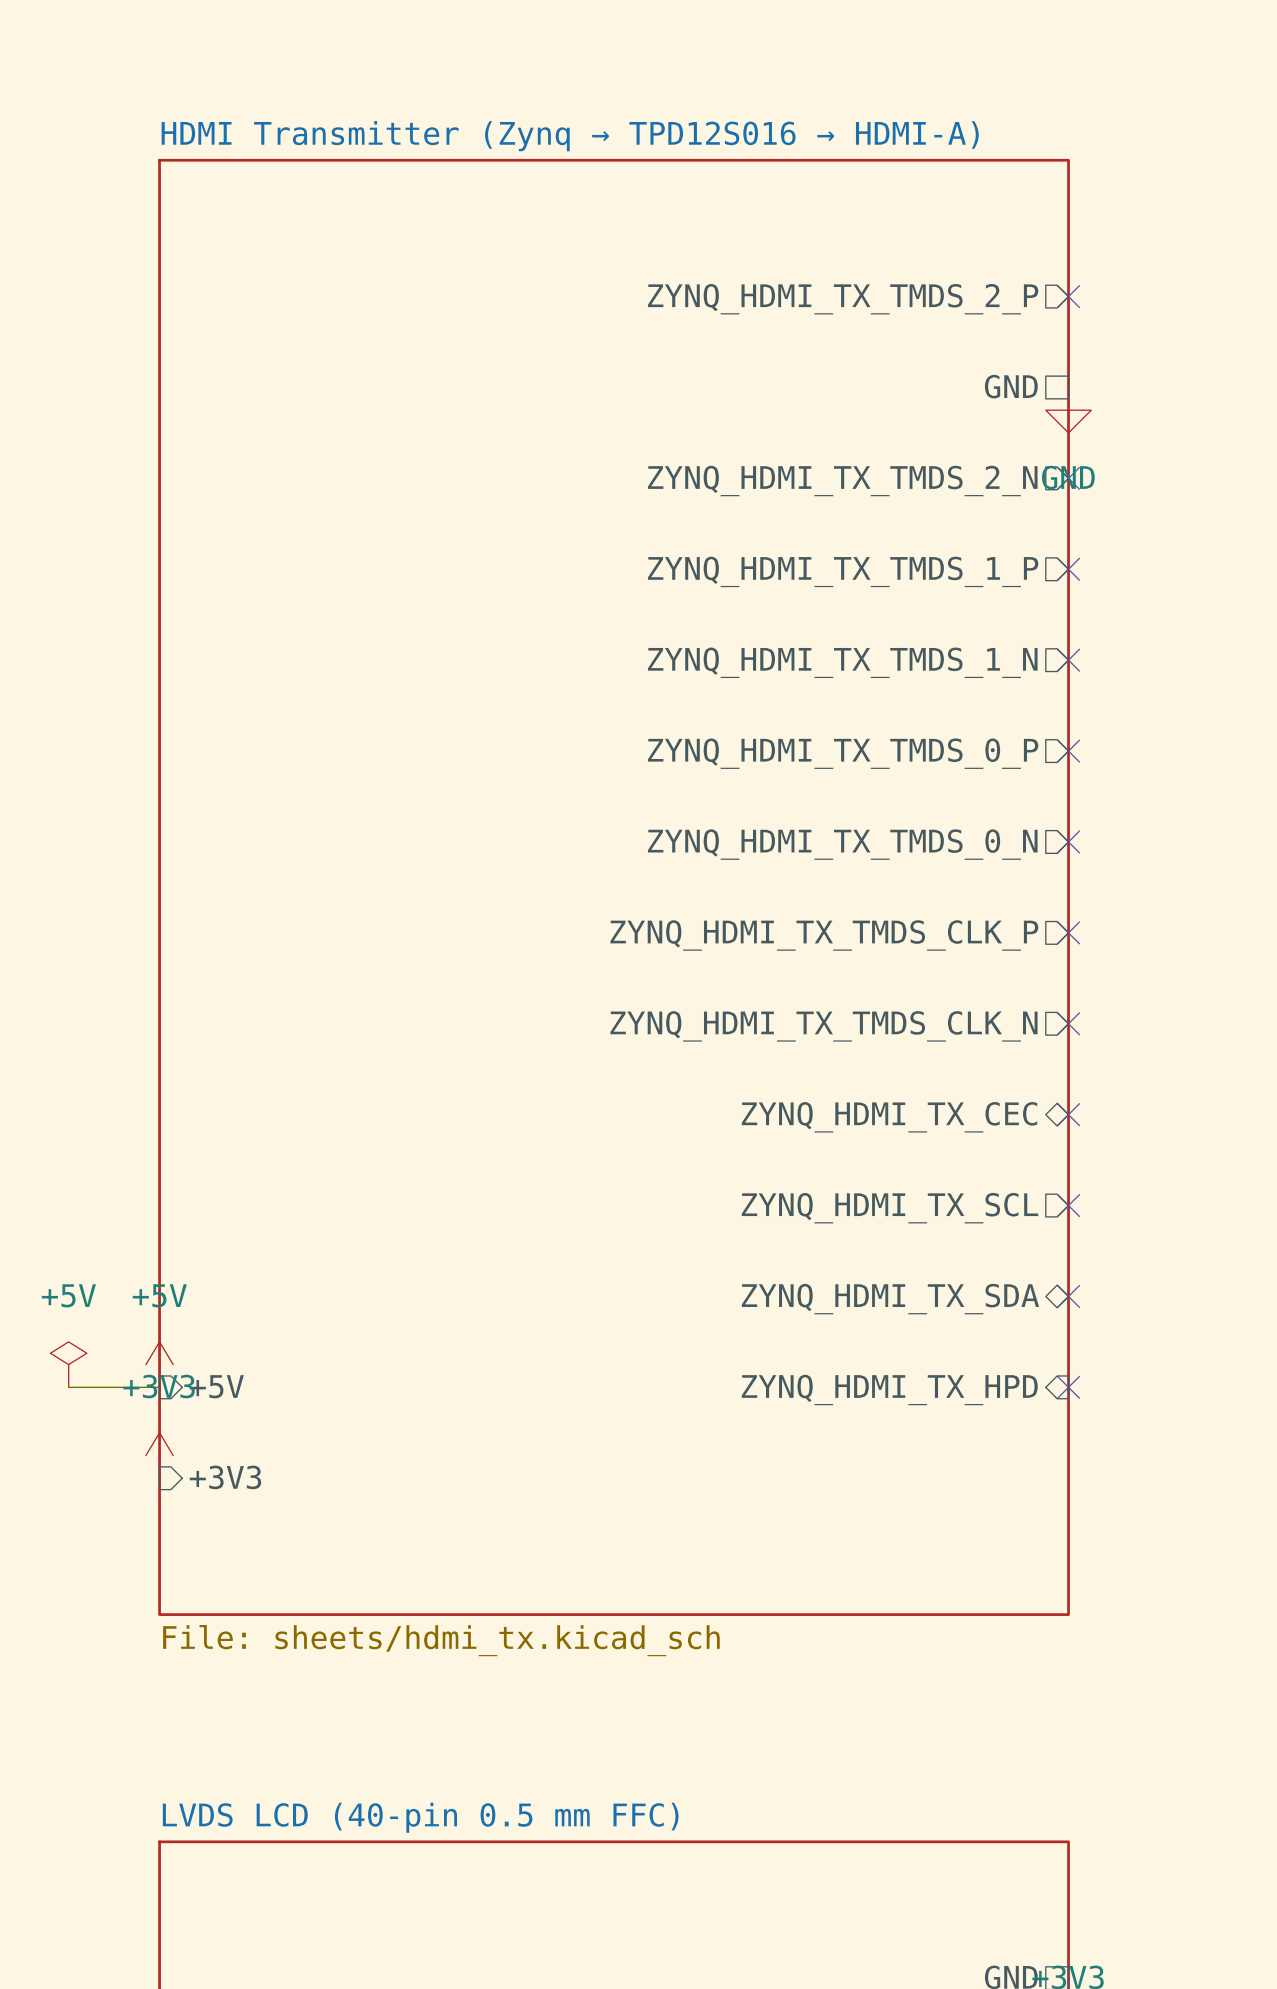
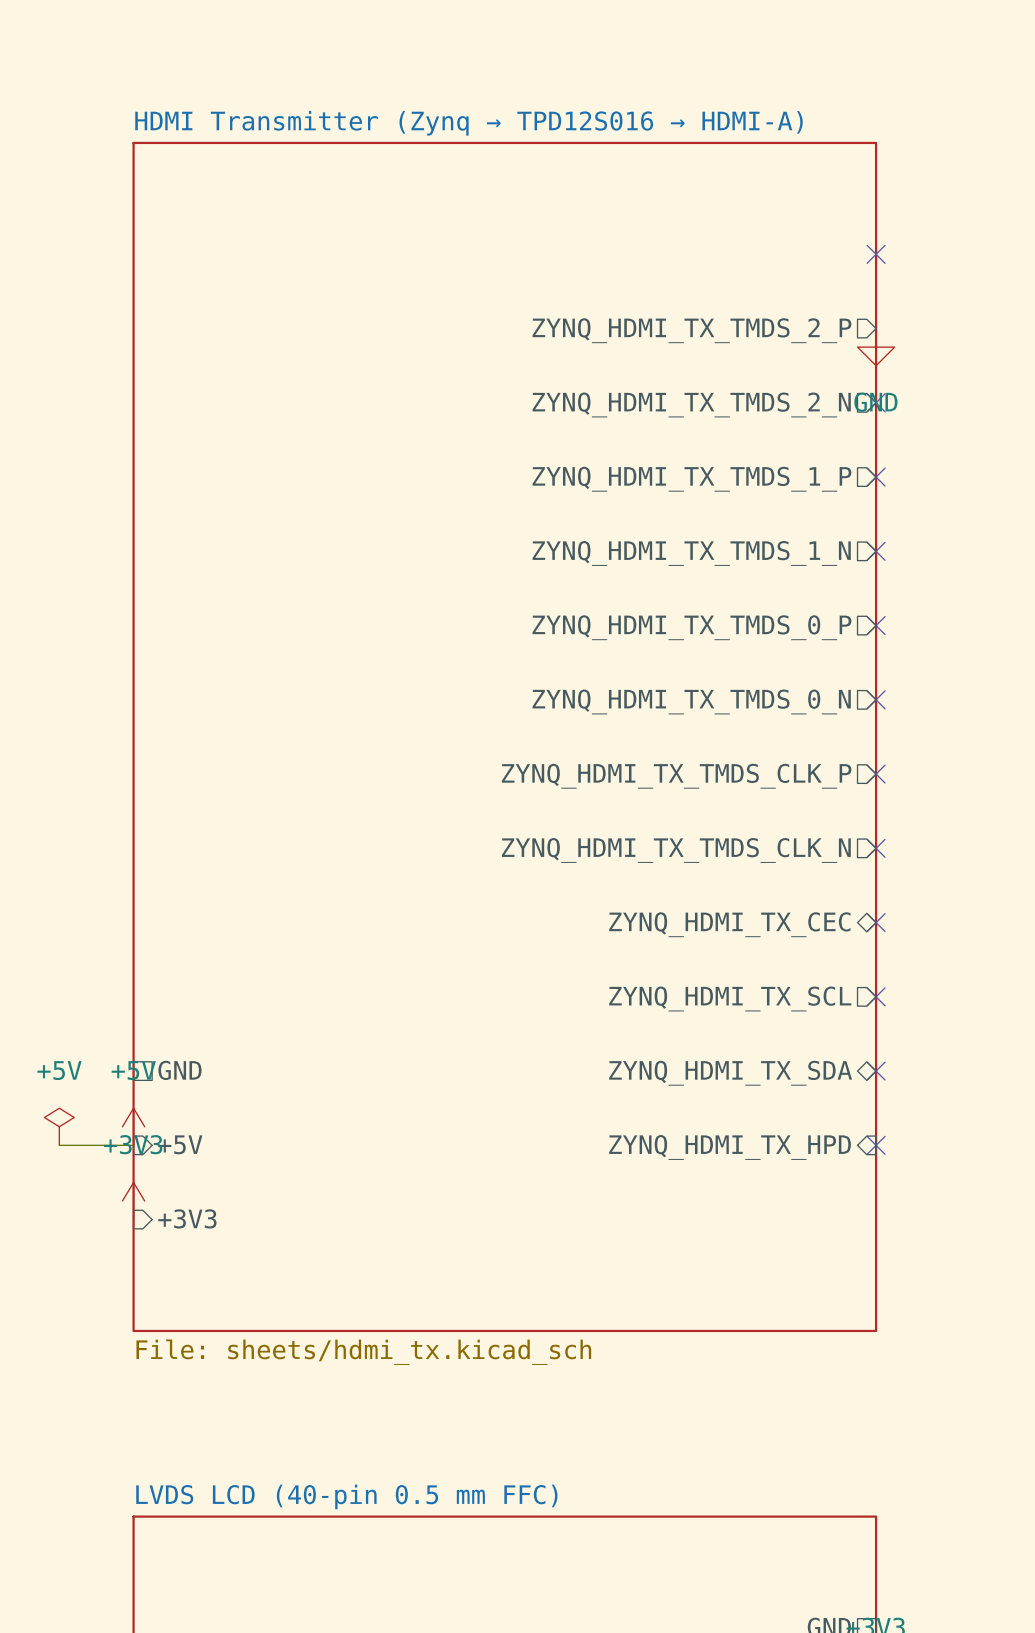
sheet pin: ZYNQ_HDMI_TX_TMDS_2_P (843, 299) -> none
sheet pin shape: passive (1011, 386) -> output (691, 330)
sheet pin: GND (1011, 386) -> ZYNQ_HDMI_TX_TMDS_2_P (691, 330)
sheet pin: none -> GND (179, 1070)

